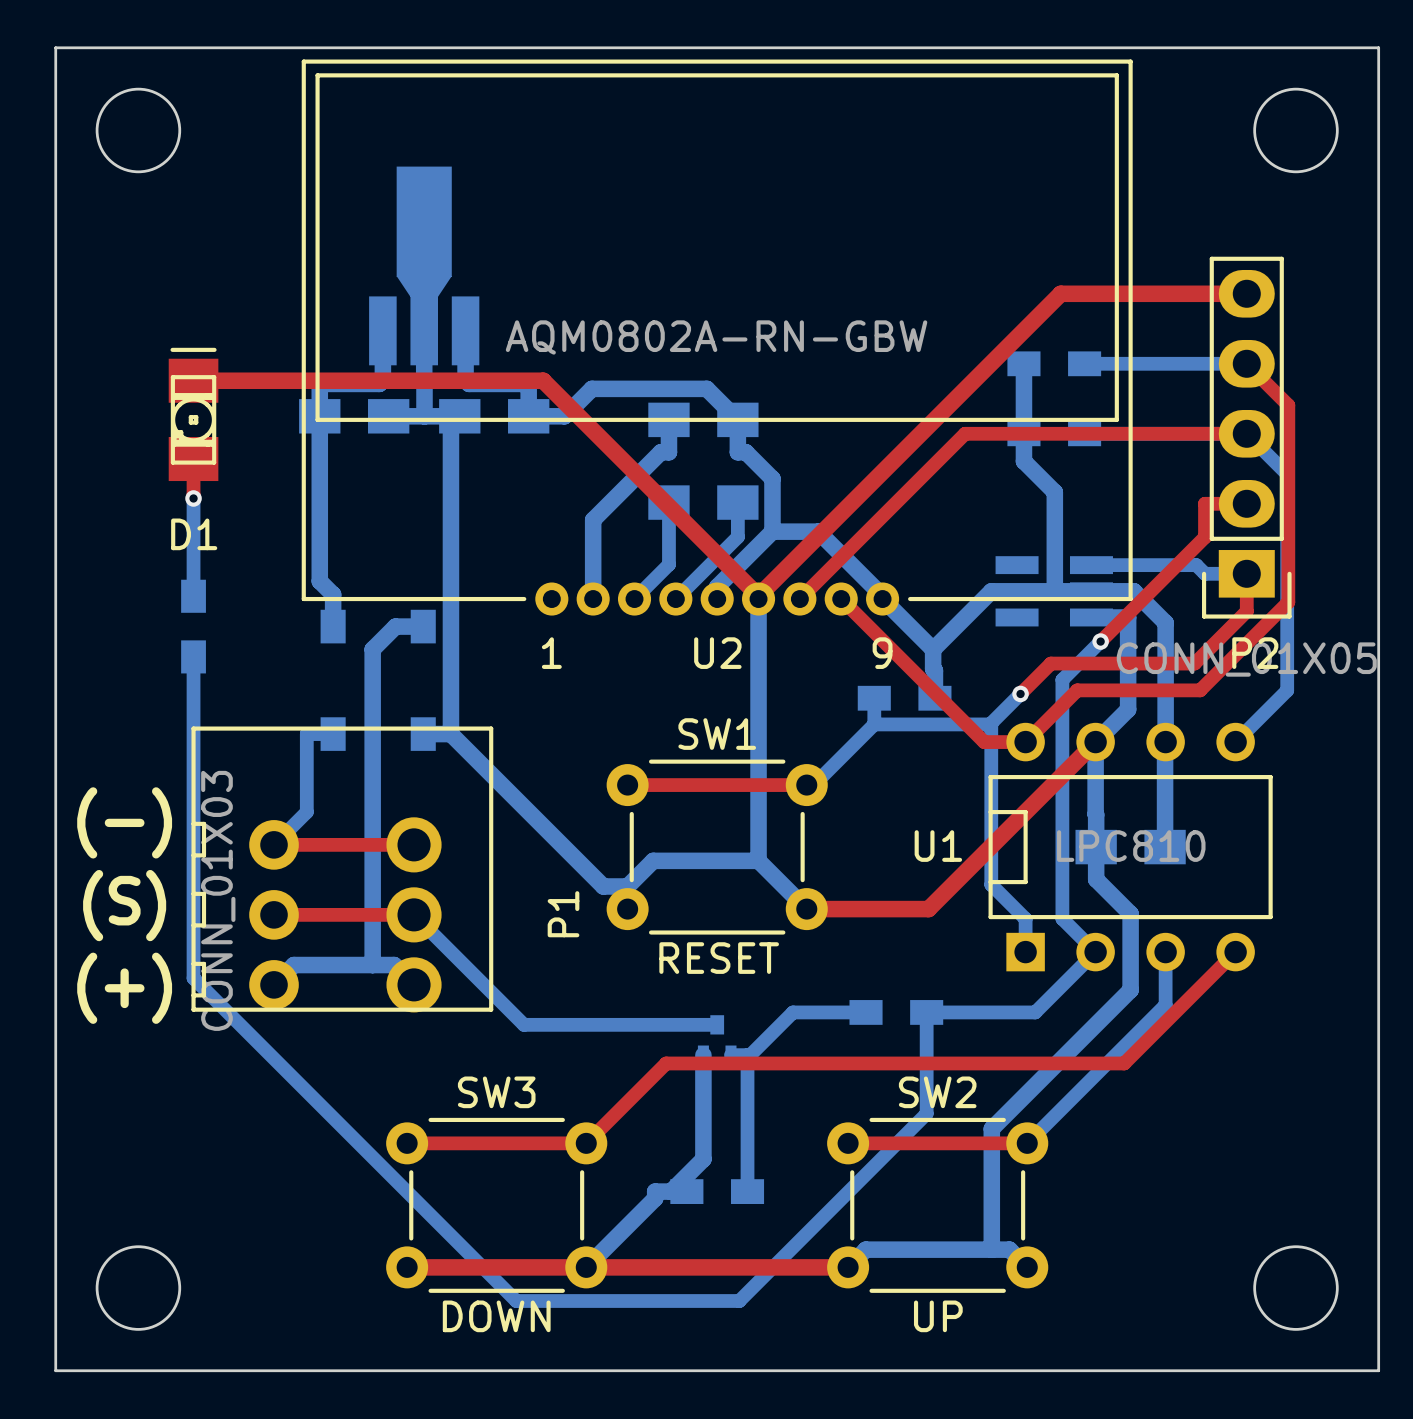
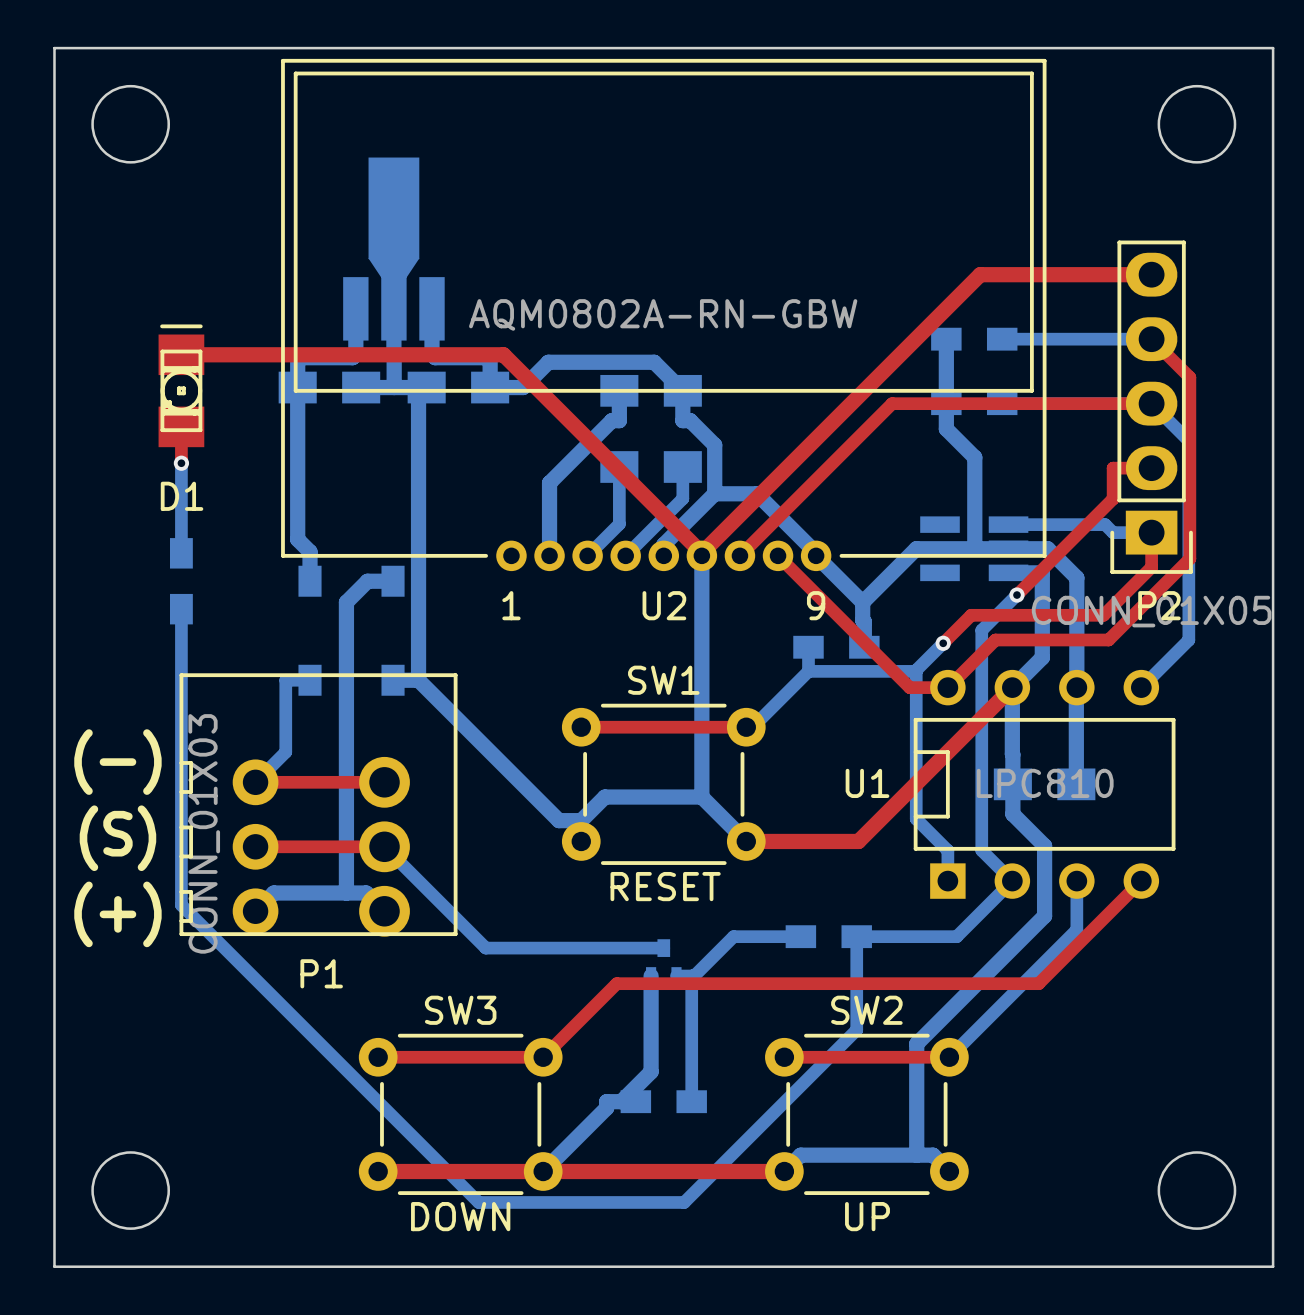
P1 name rotation: 0° (563, 914) -> 90° clockwise (321, 973)
P1 name position: P1 (563, 914) -> P1 (321, 973)

